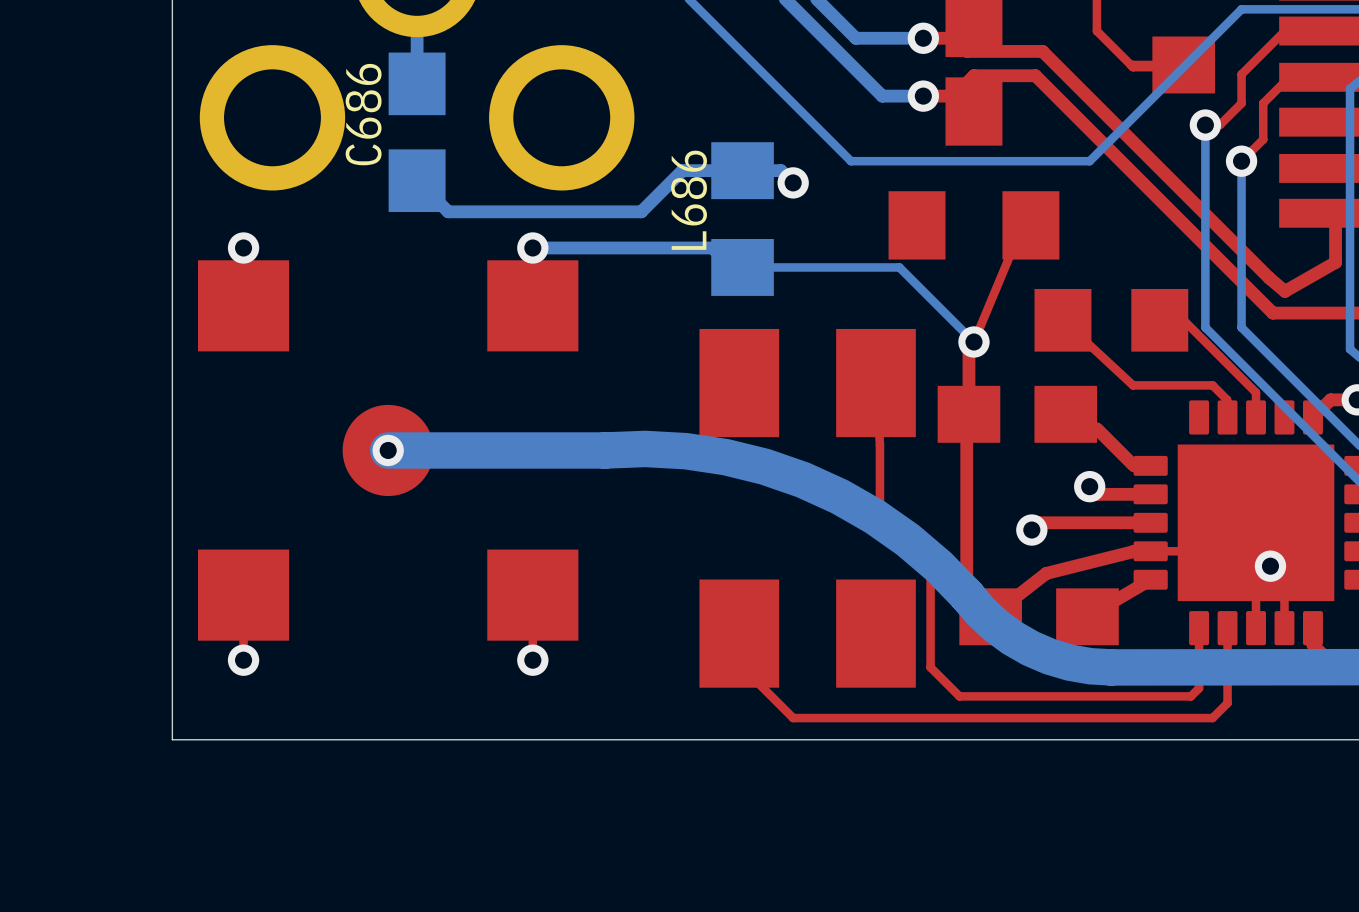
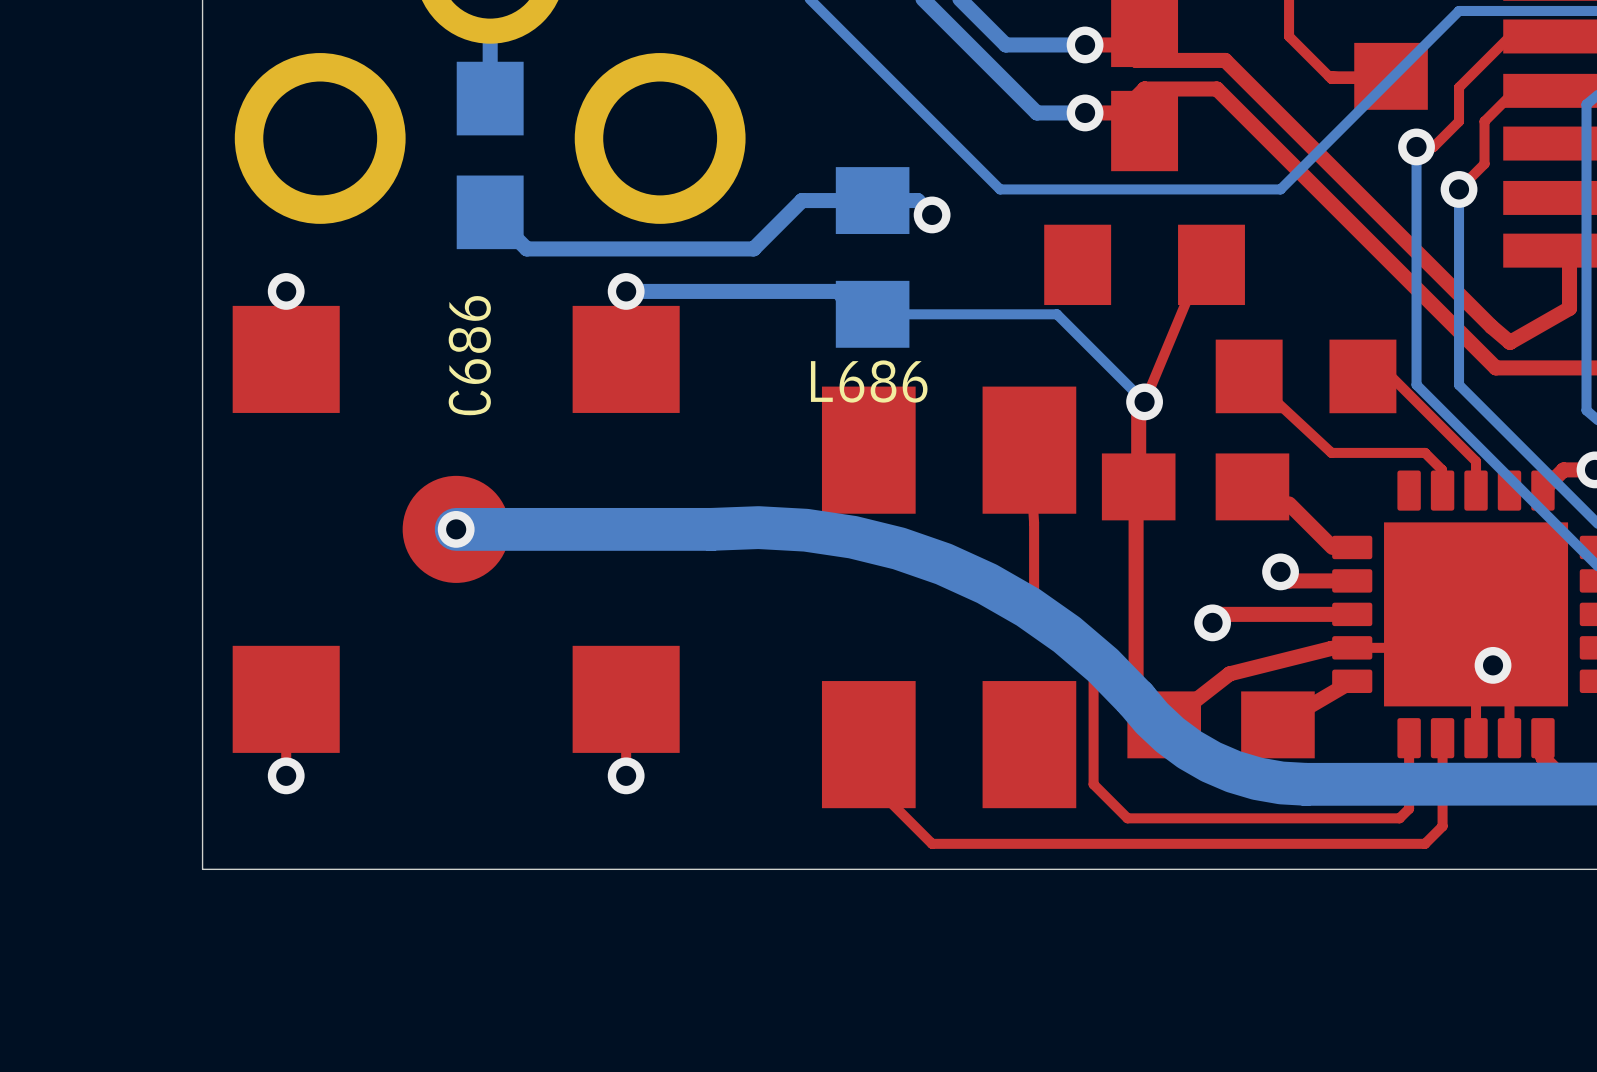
C686 name position: C686 (363, 114) -> C686 (469, 355)
L686 name rotation: 0° (689, 200) -> 90° clockwise (869, 381)
L686 name position: L686 (689, 200) -> L686 (869, 381)

